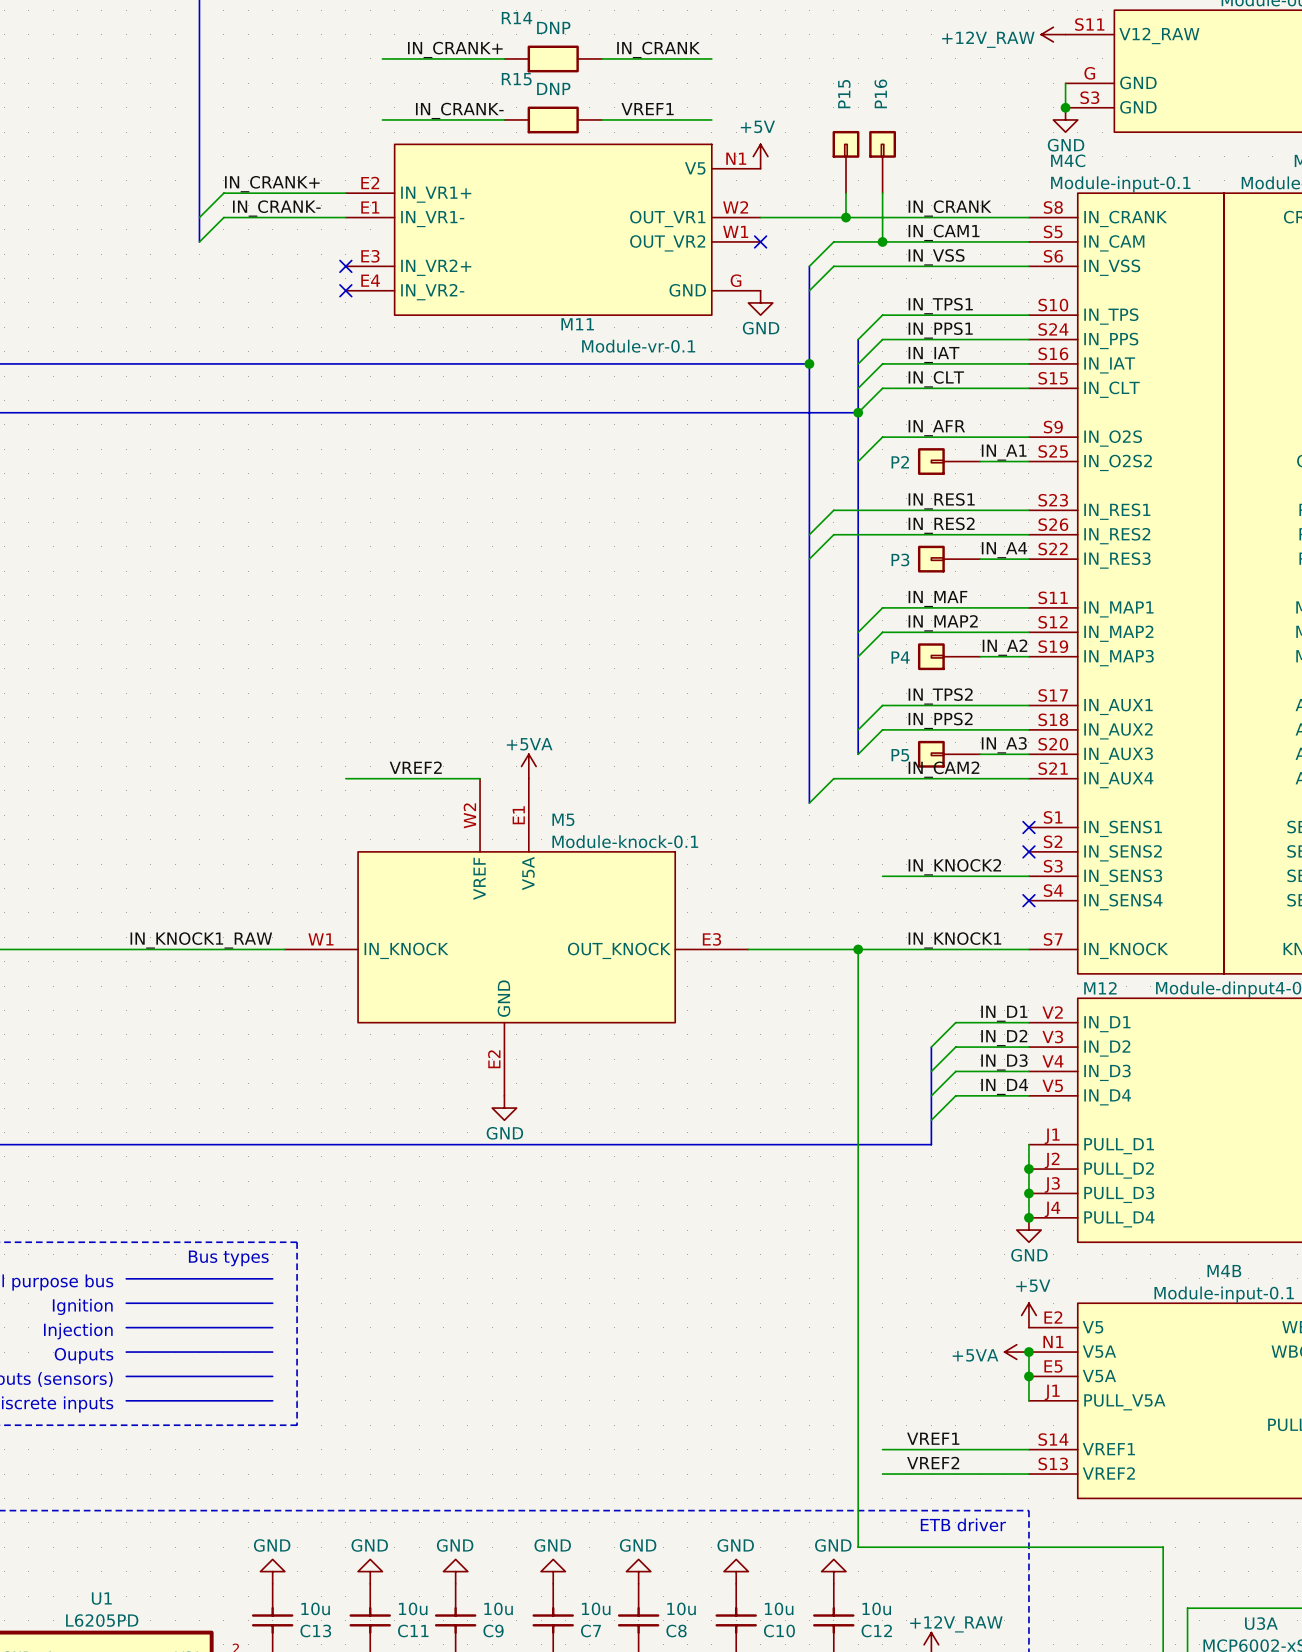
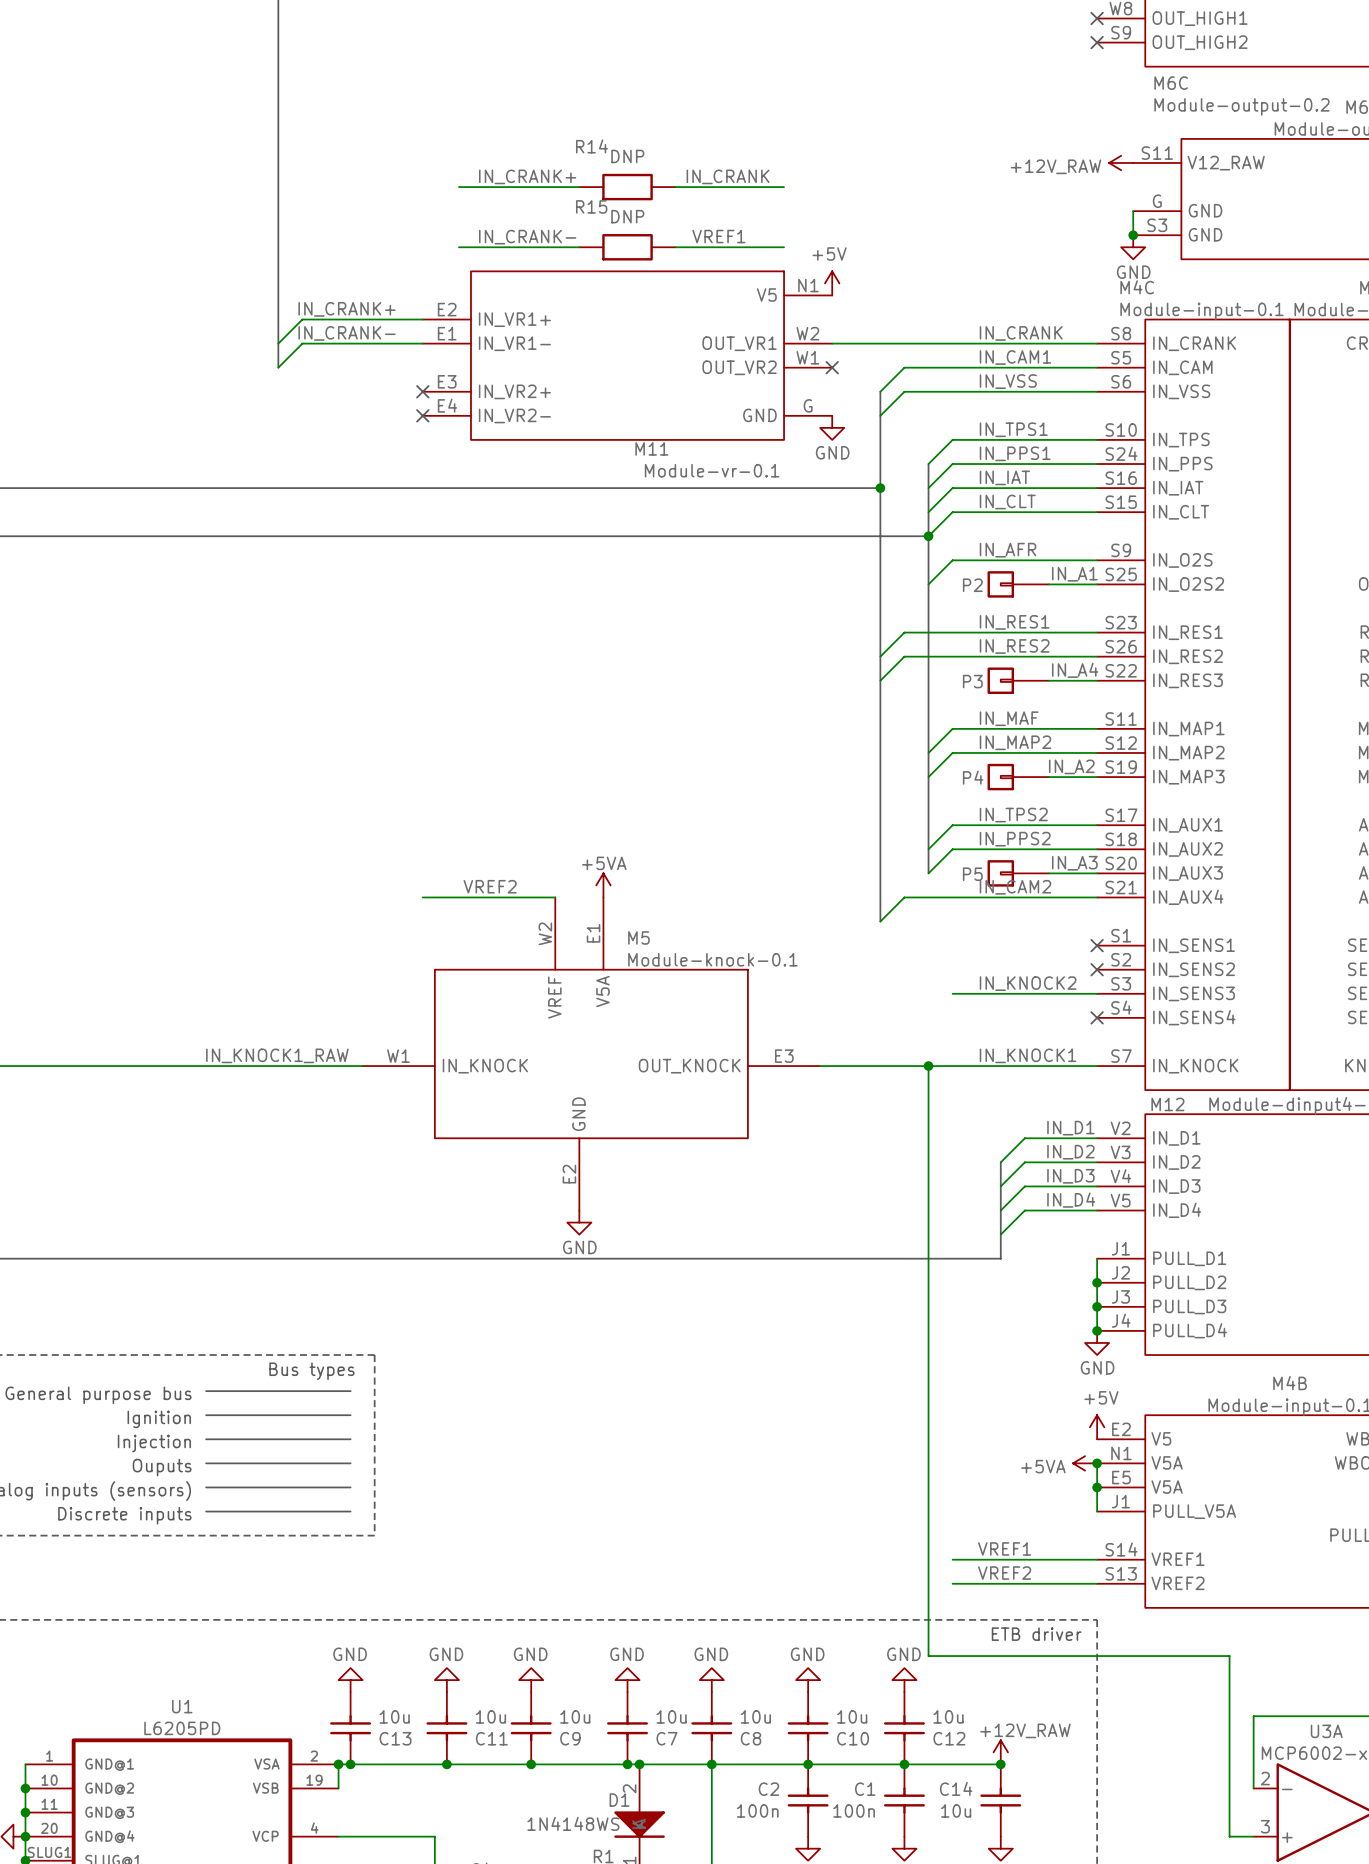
P15: (845, 162) -> none
P16: (882, 162) -> none
wire: (845, 193) (845, 217) -> none
wire: (882, 193) (882, 241) -> none
junction: (845, 217) -> none
junction: (882, 241) -> none

